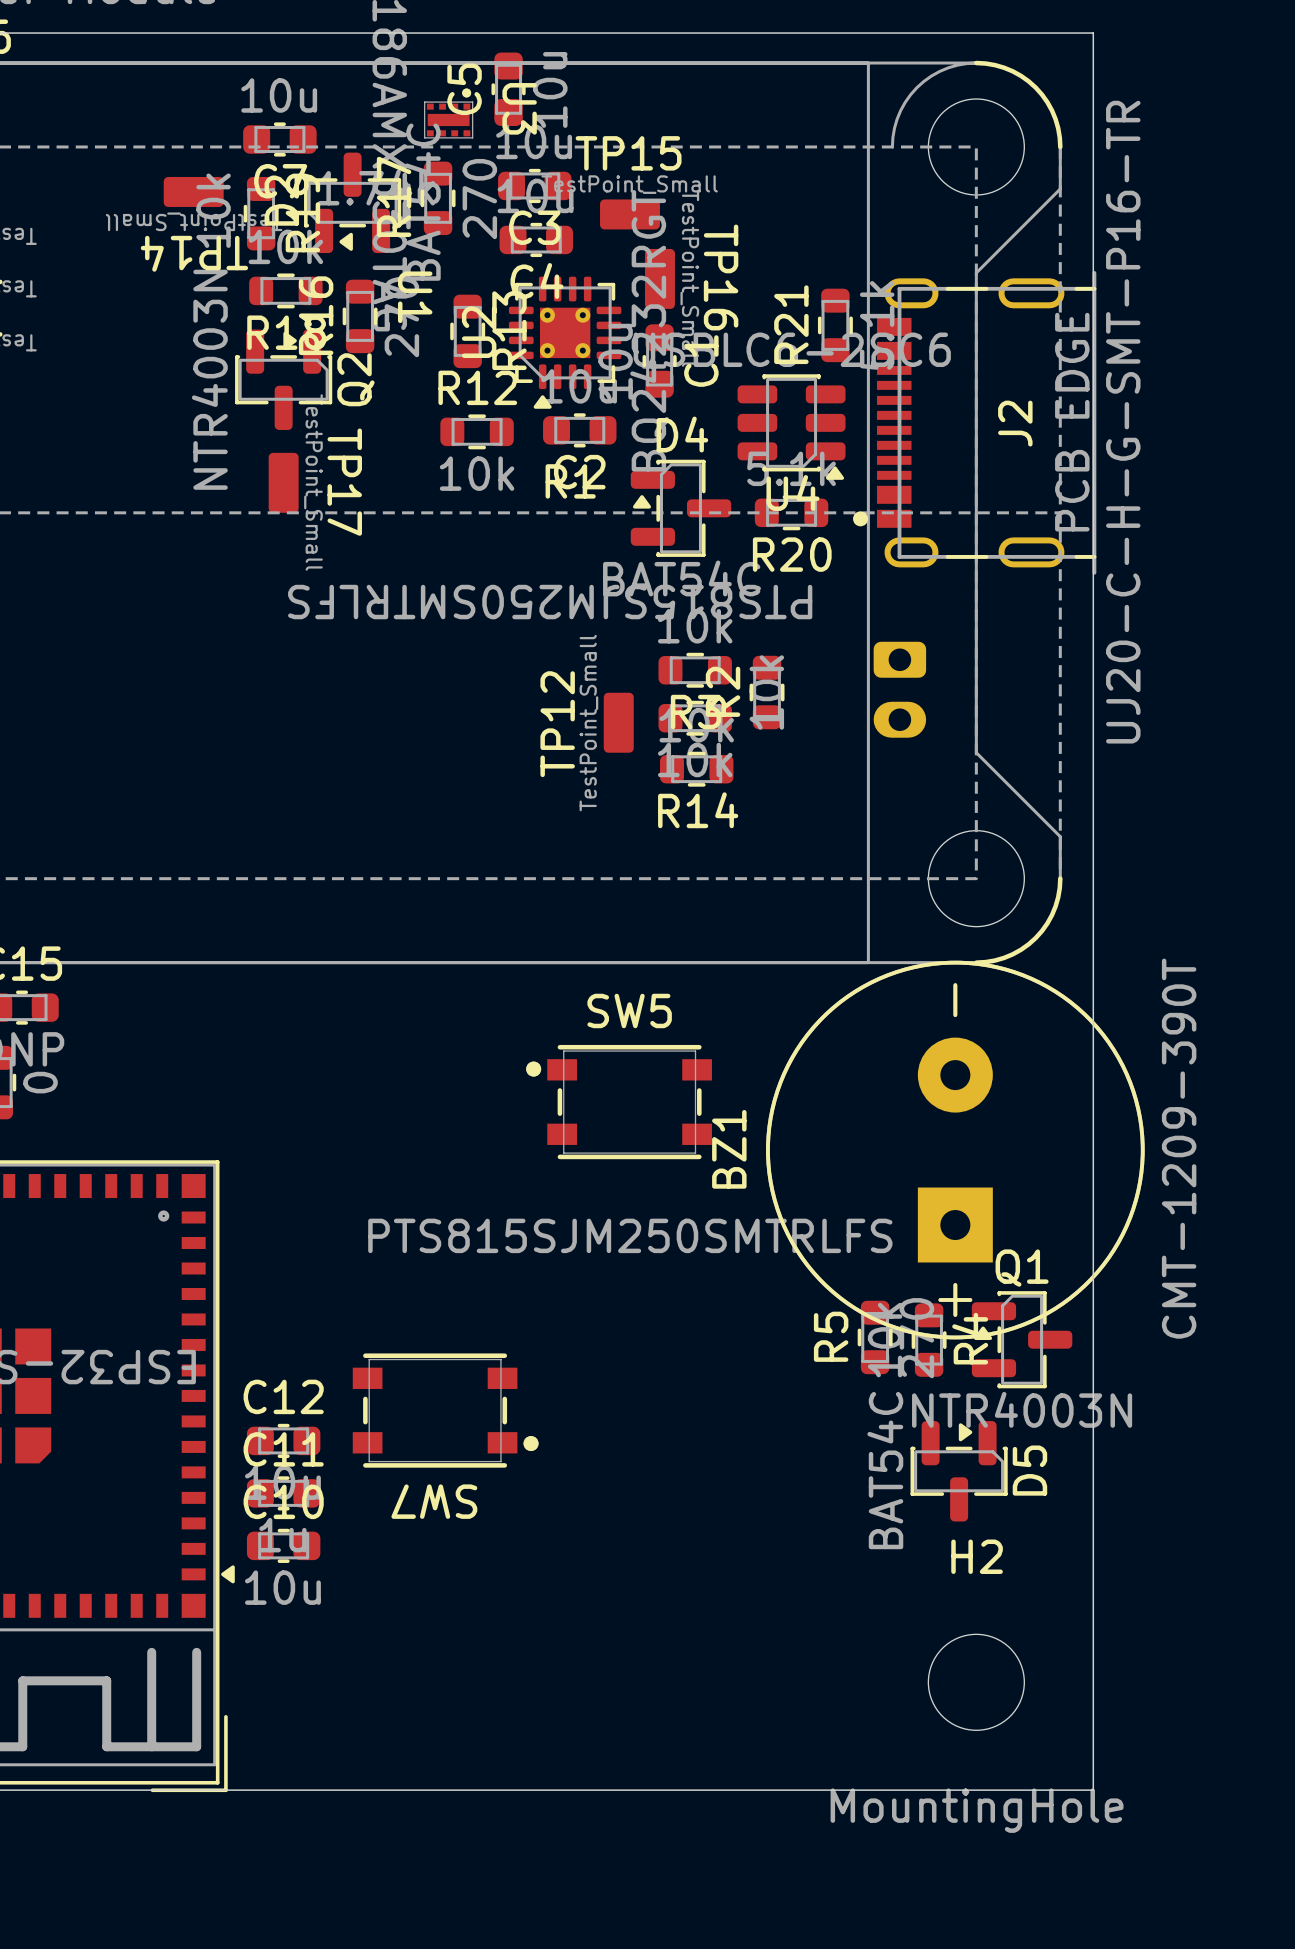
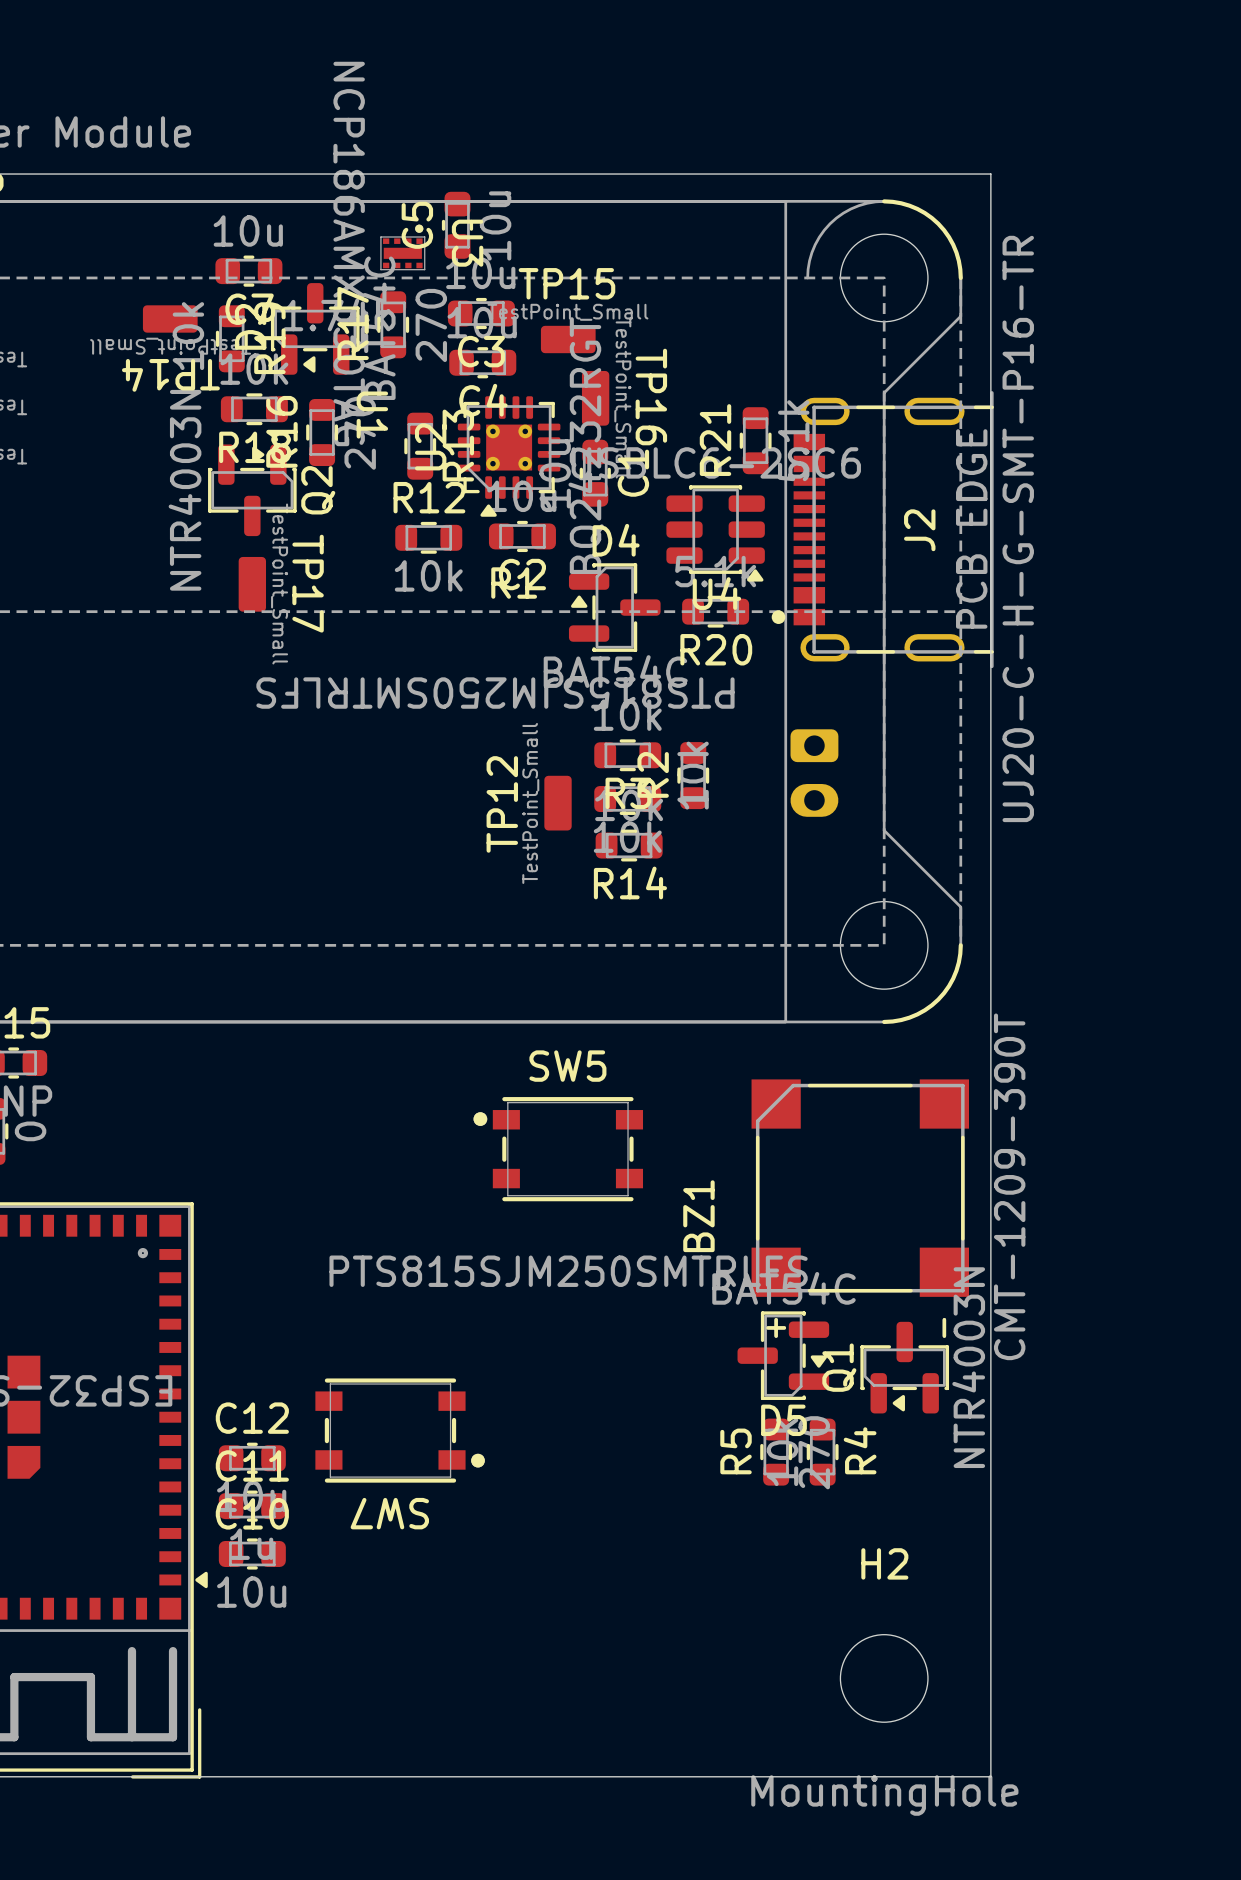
BZ1 footprint: [766, 960, 1145, 1340] -> [751, 1079, 969, 1338]
BZ1 value position: CMT-1209-390T (1179, 1148) -> CMT-1209-390T (1009, 1186)
R5 position: (875, 1337) -> (776, 1452)
Q1 rotation: 0° (1022, 1339) -> 90° counterclockwise (904, 1367)
R4 position: (929, 1340) -> (822, 1452)
D5 rotation: 0° (959, 1471) -> 90° clockwise (783, 1355)
D5 position: (959, 1471) -> (783, 1355)

